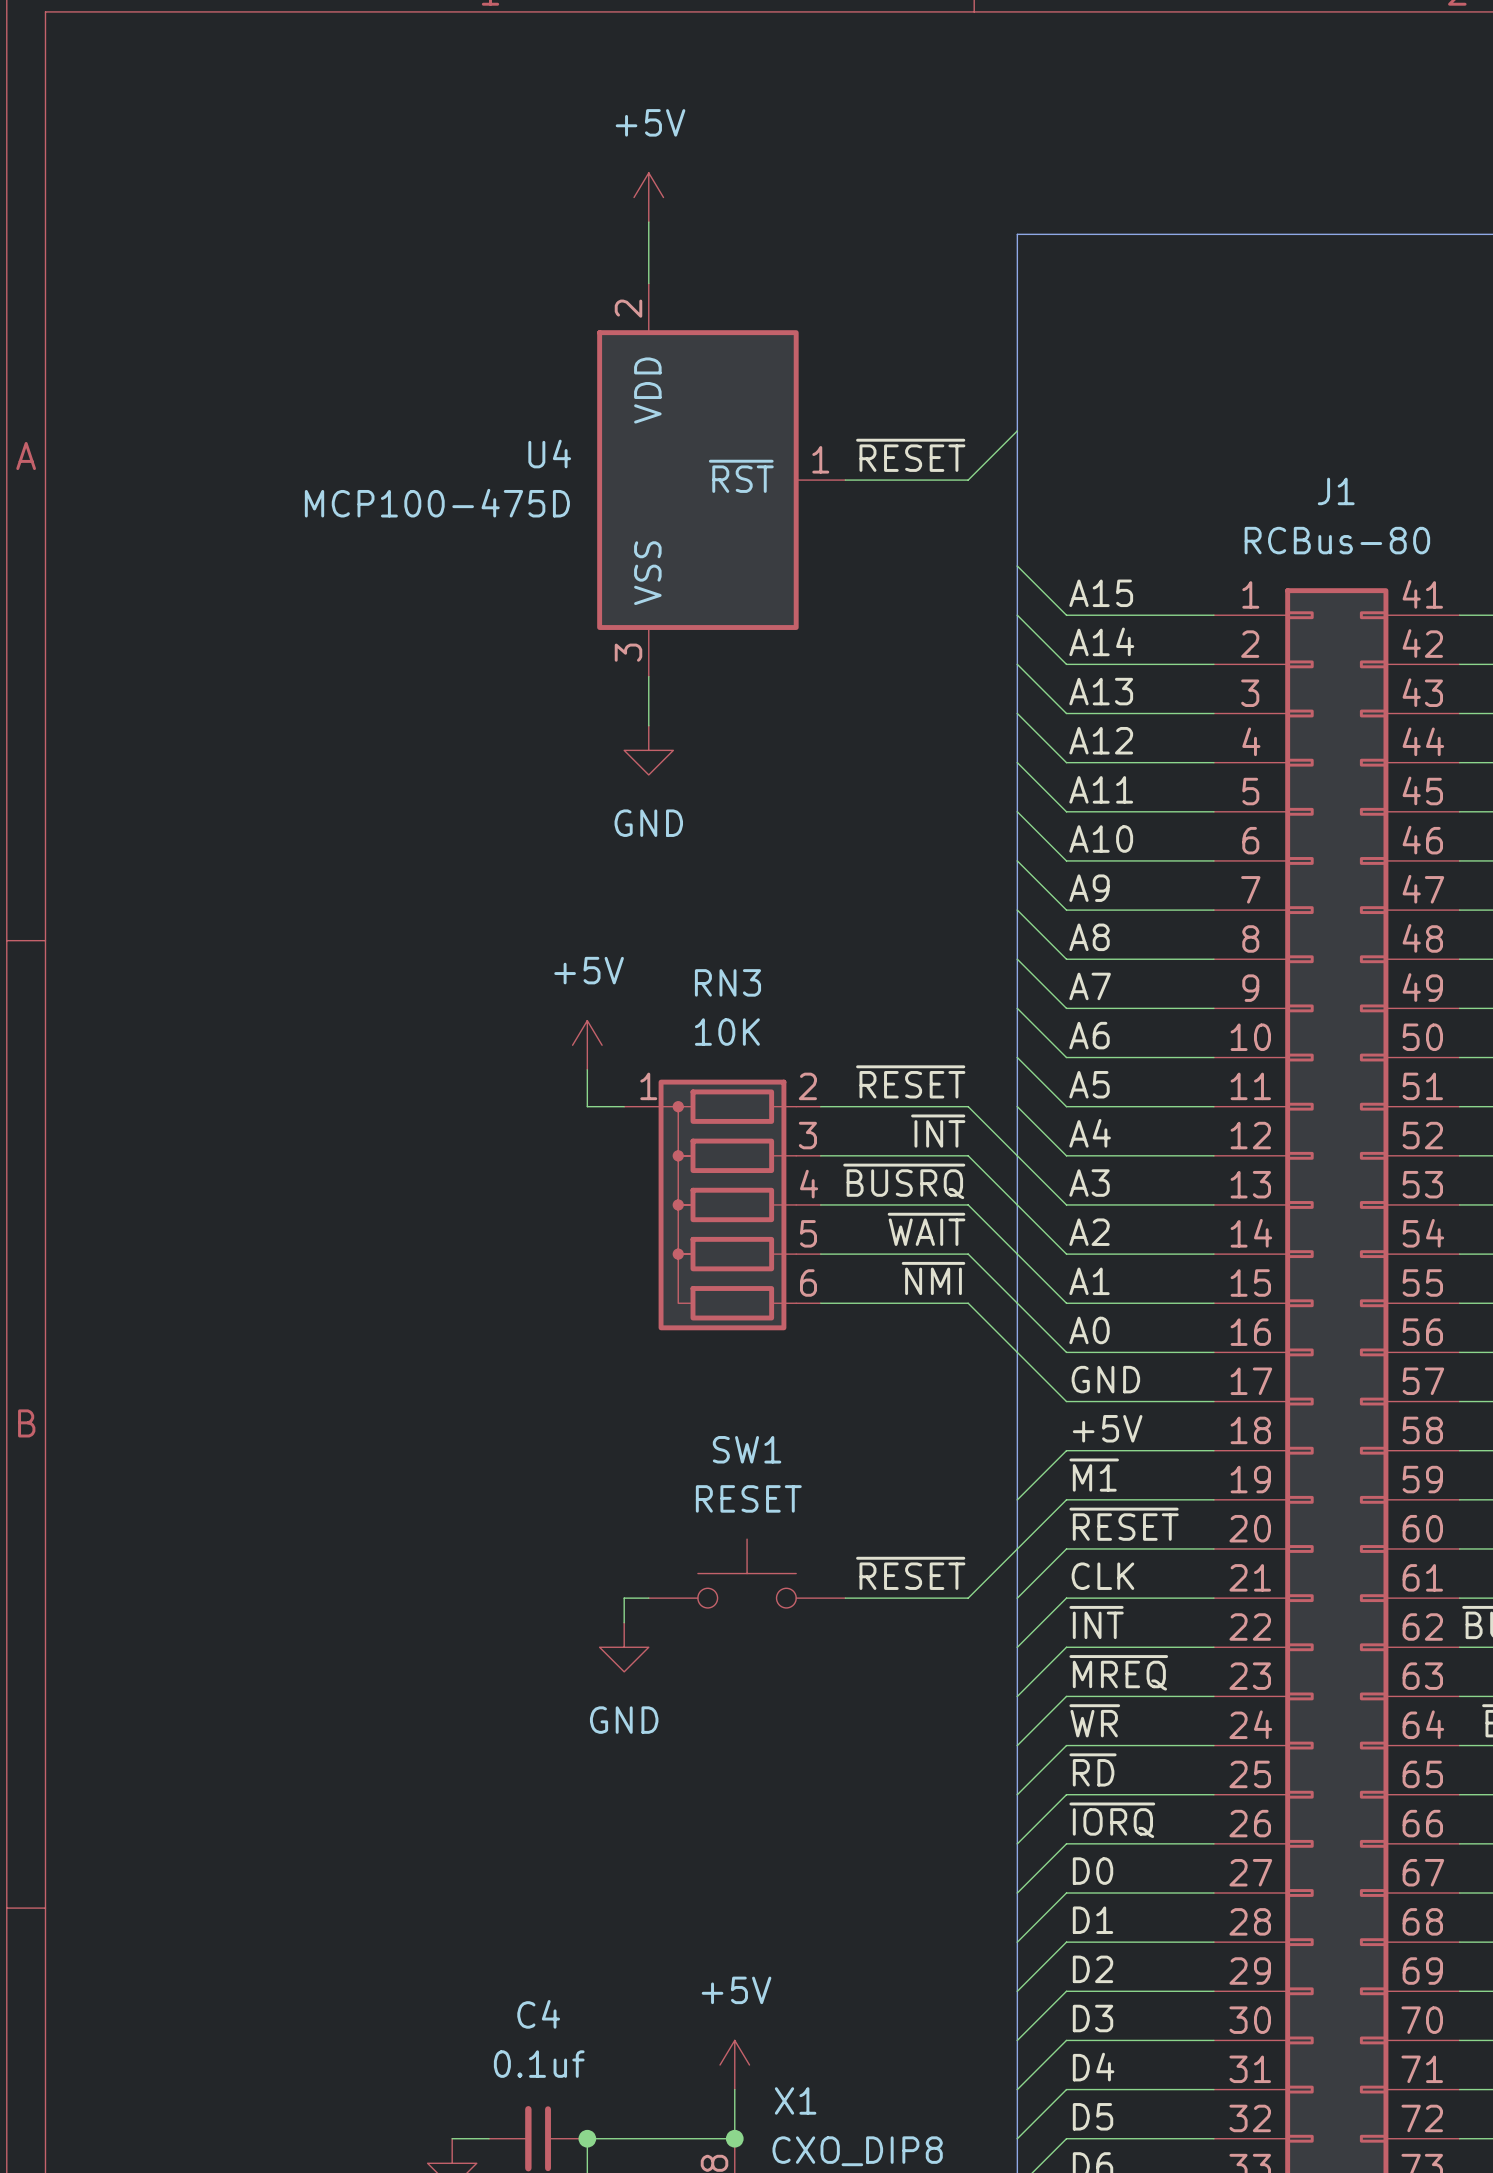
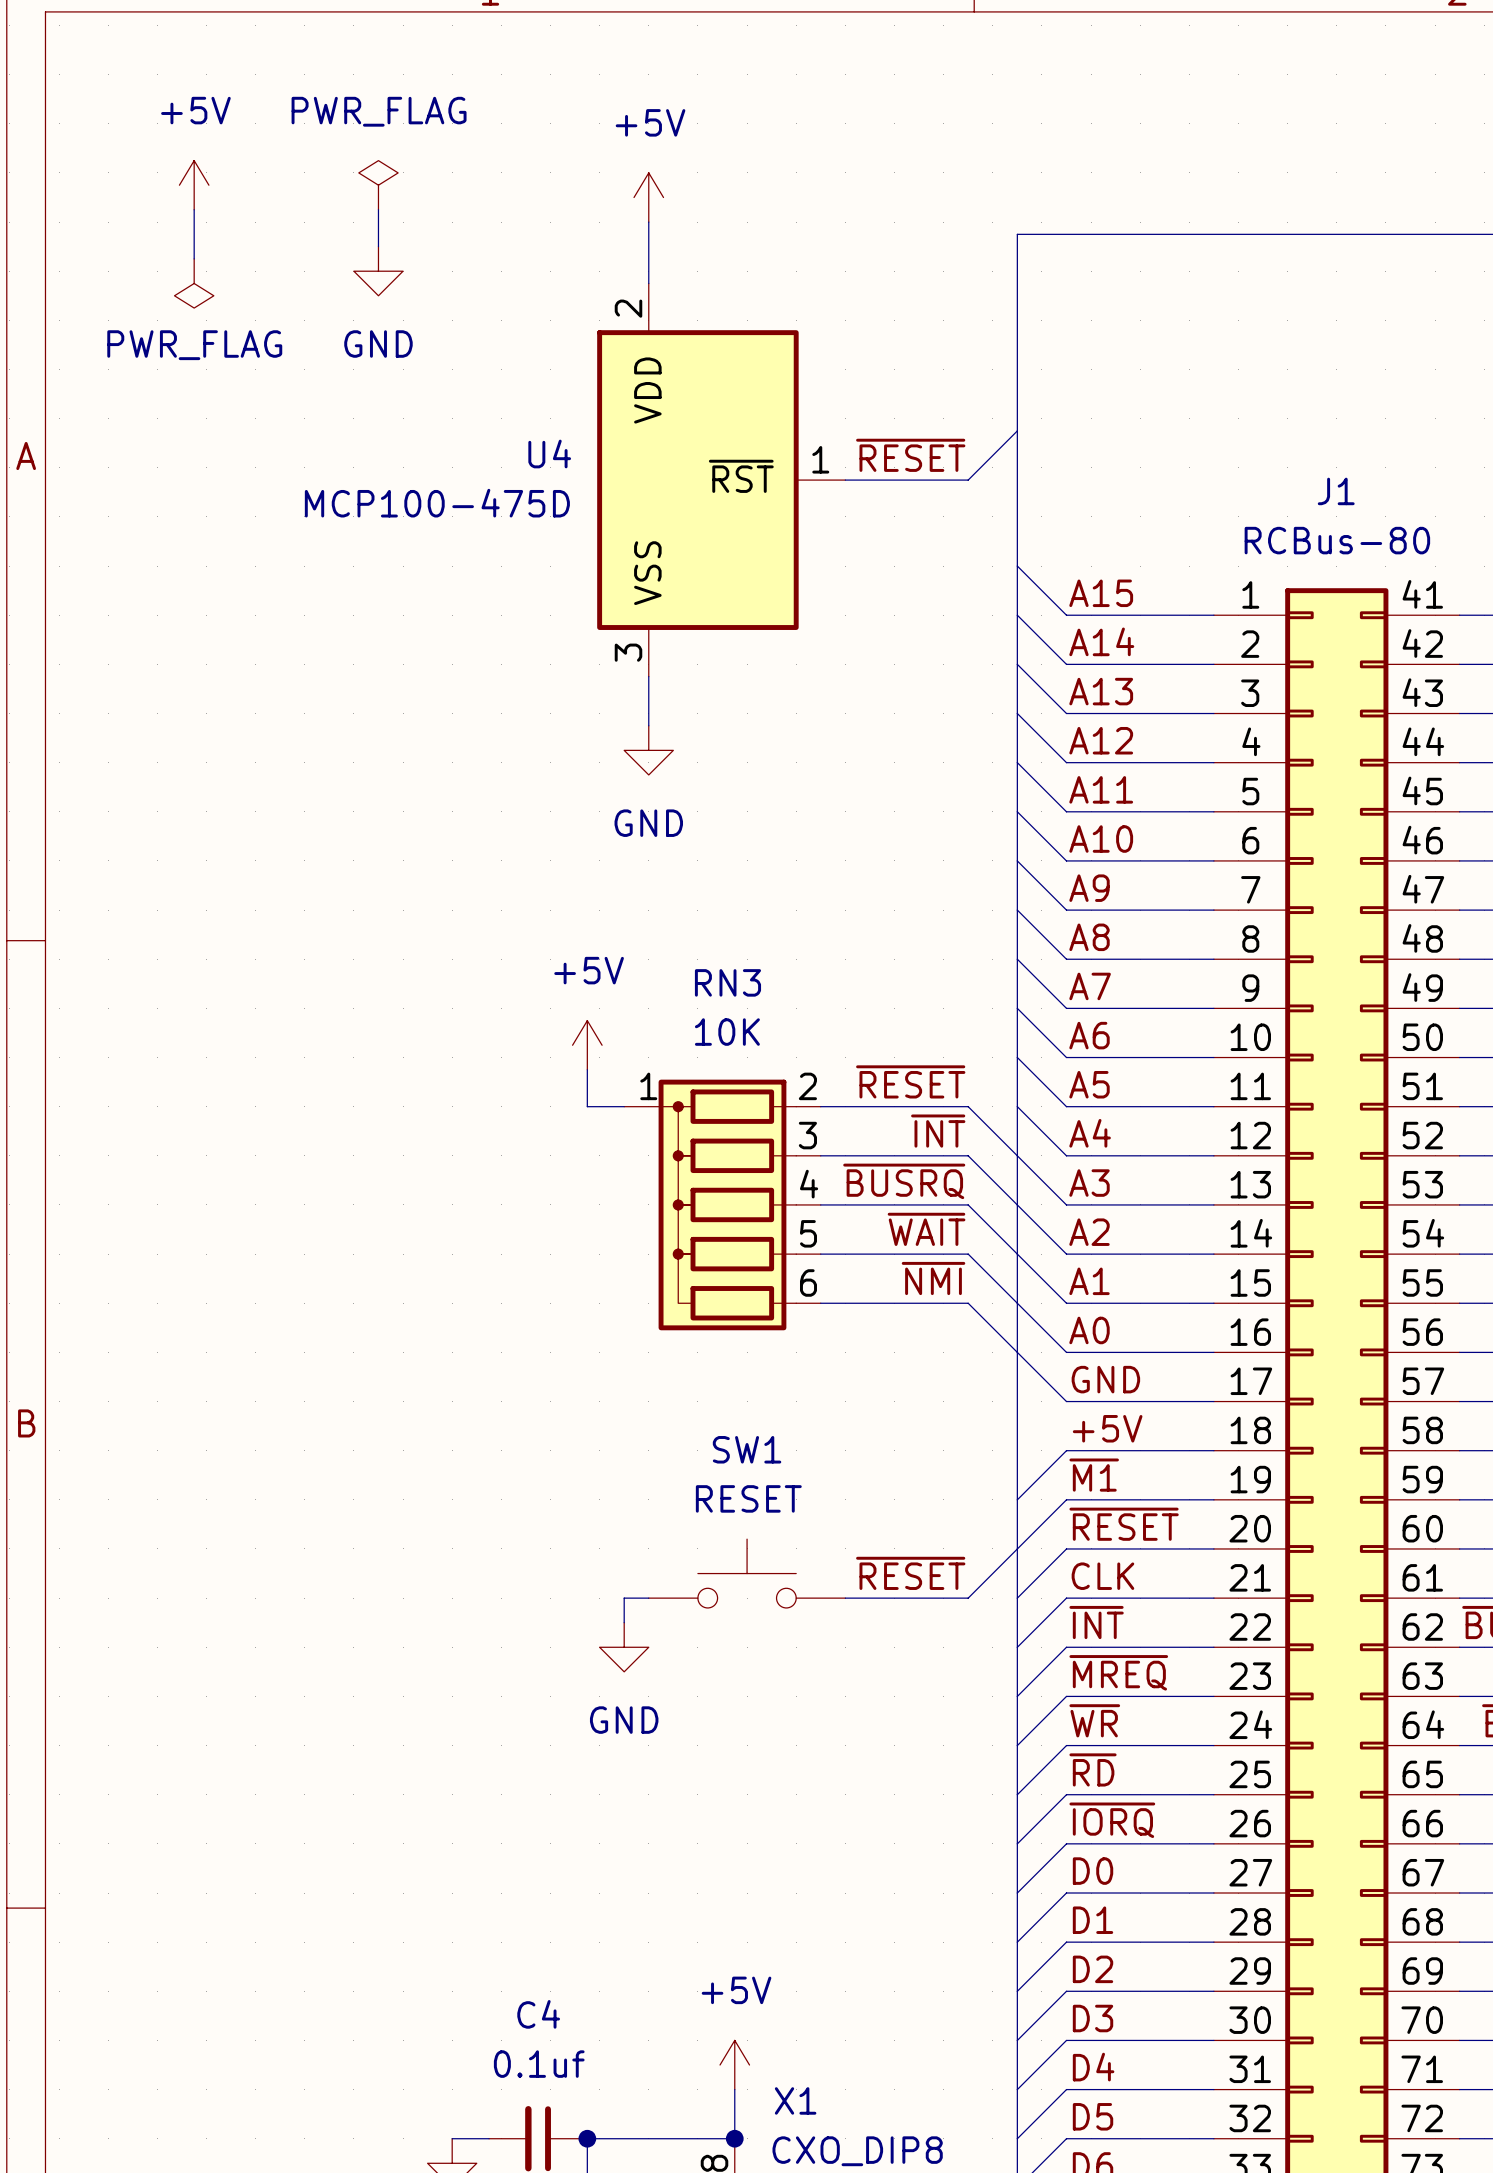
power symbol: none -> +5V (194, 185)
power symbol: none -> PWR_FLAG (378, 185)
wire: none -> (194, 209) (194, 258)
wire: none -> (378, 209) (378, 246)
power symbol: none -> GND (378, 271)
power symbol: none -> PWR_FLAG (194, 283)

